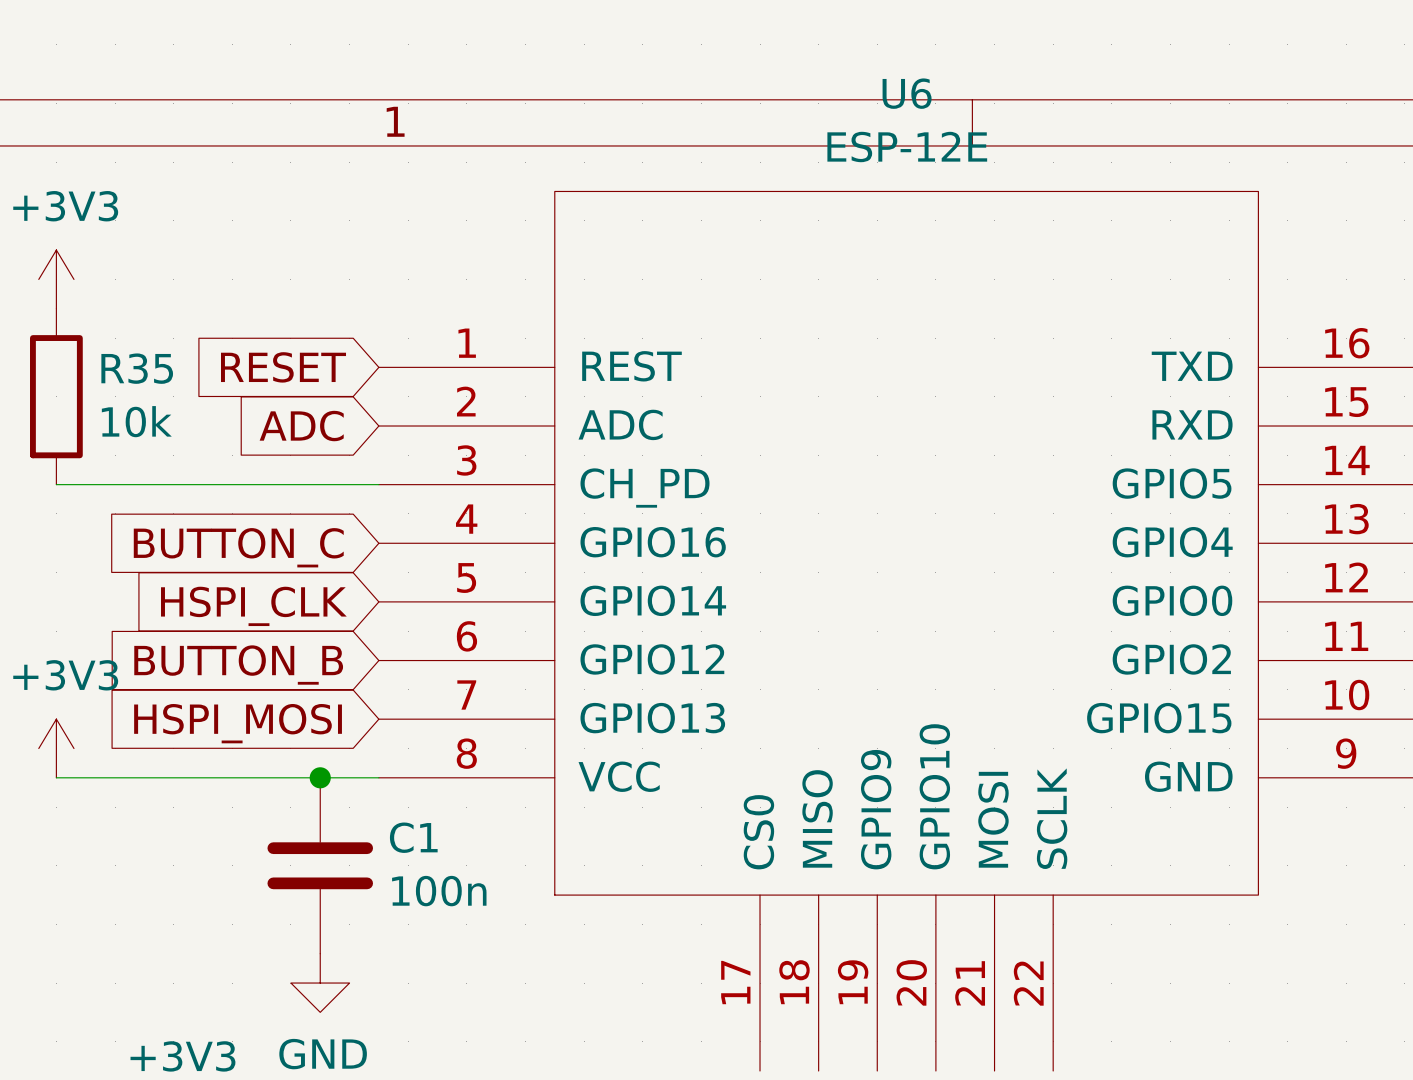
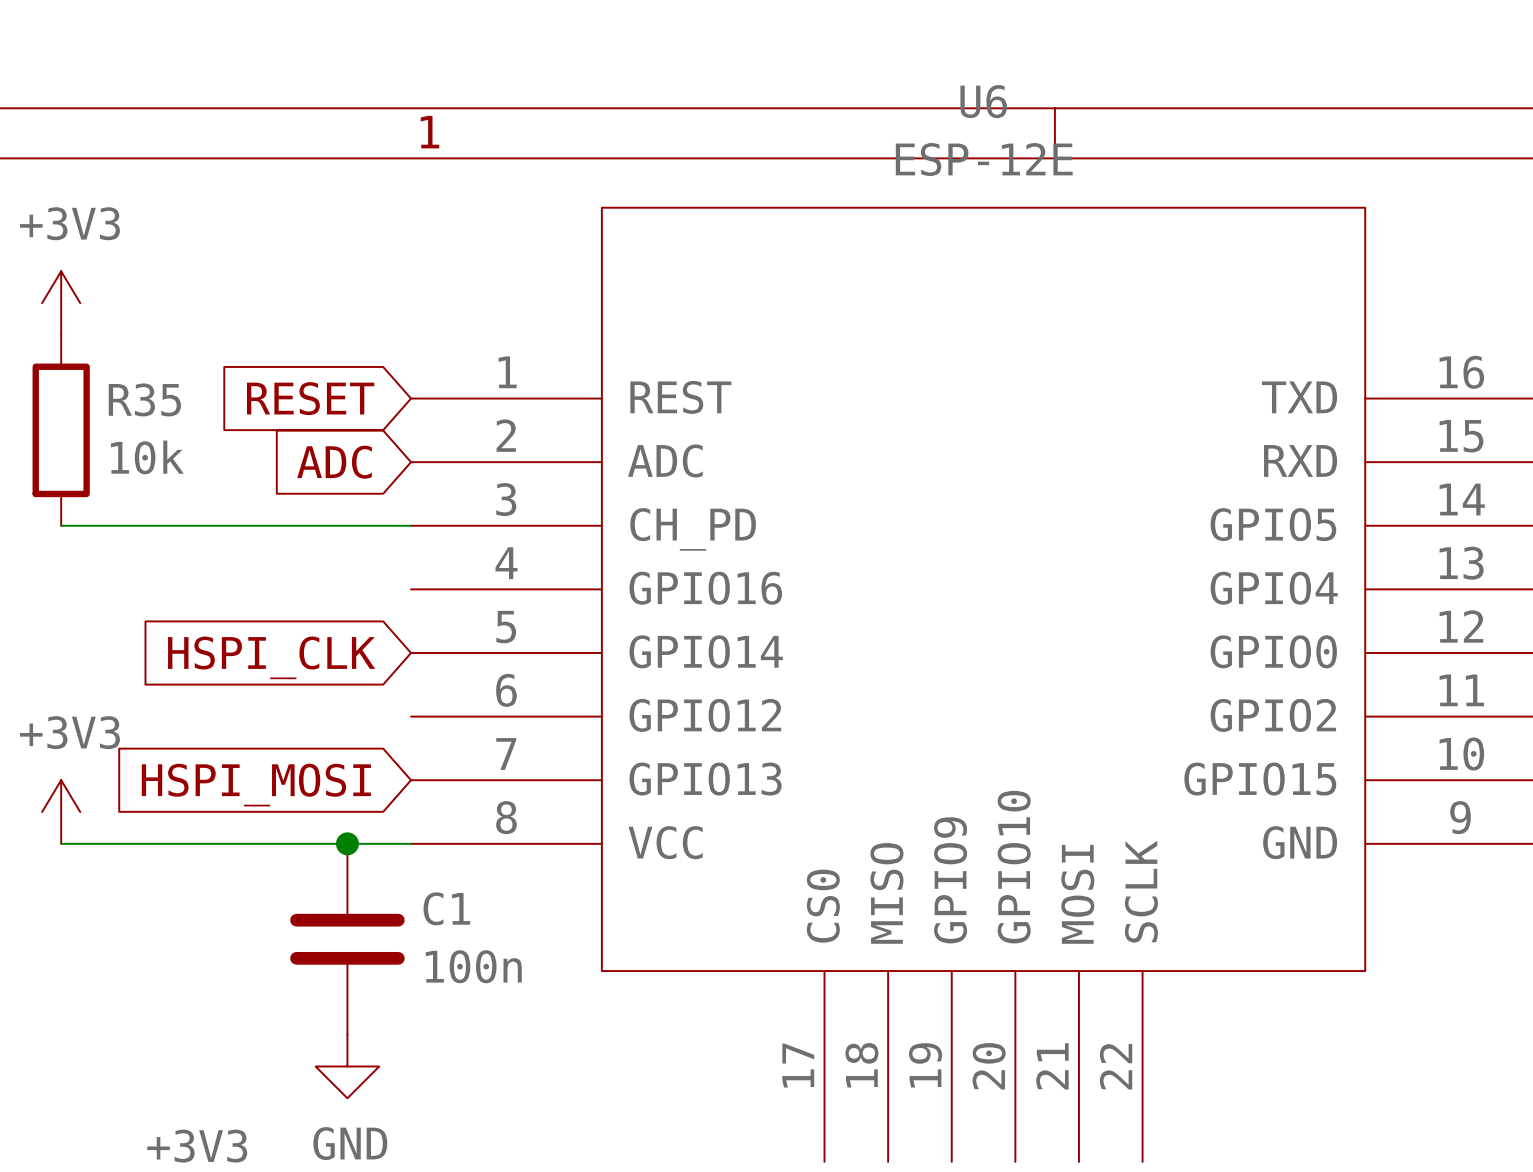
global label: BUTTON_C (238, 547) -> none
global label: BUTTON_B (238, 665) -> none

